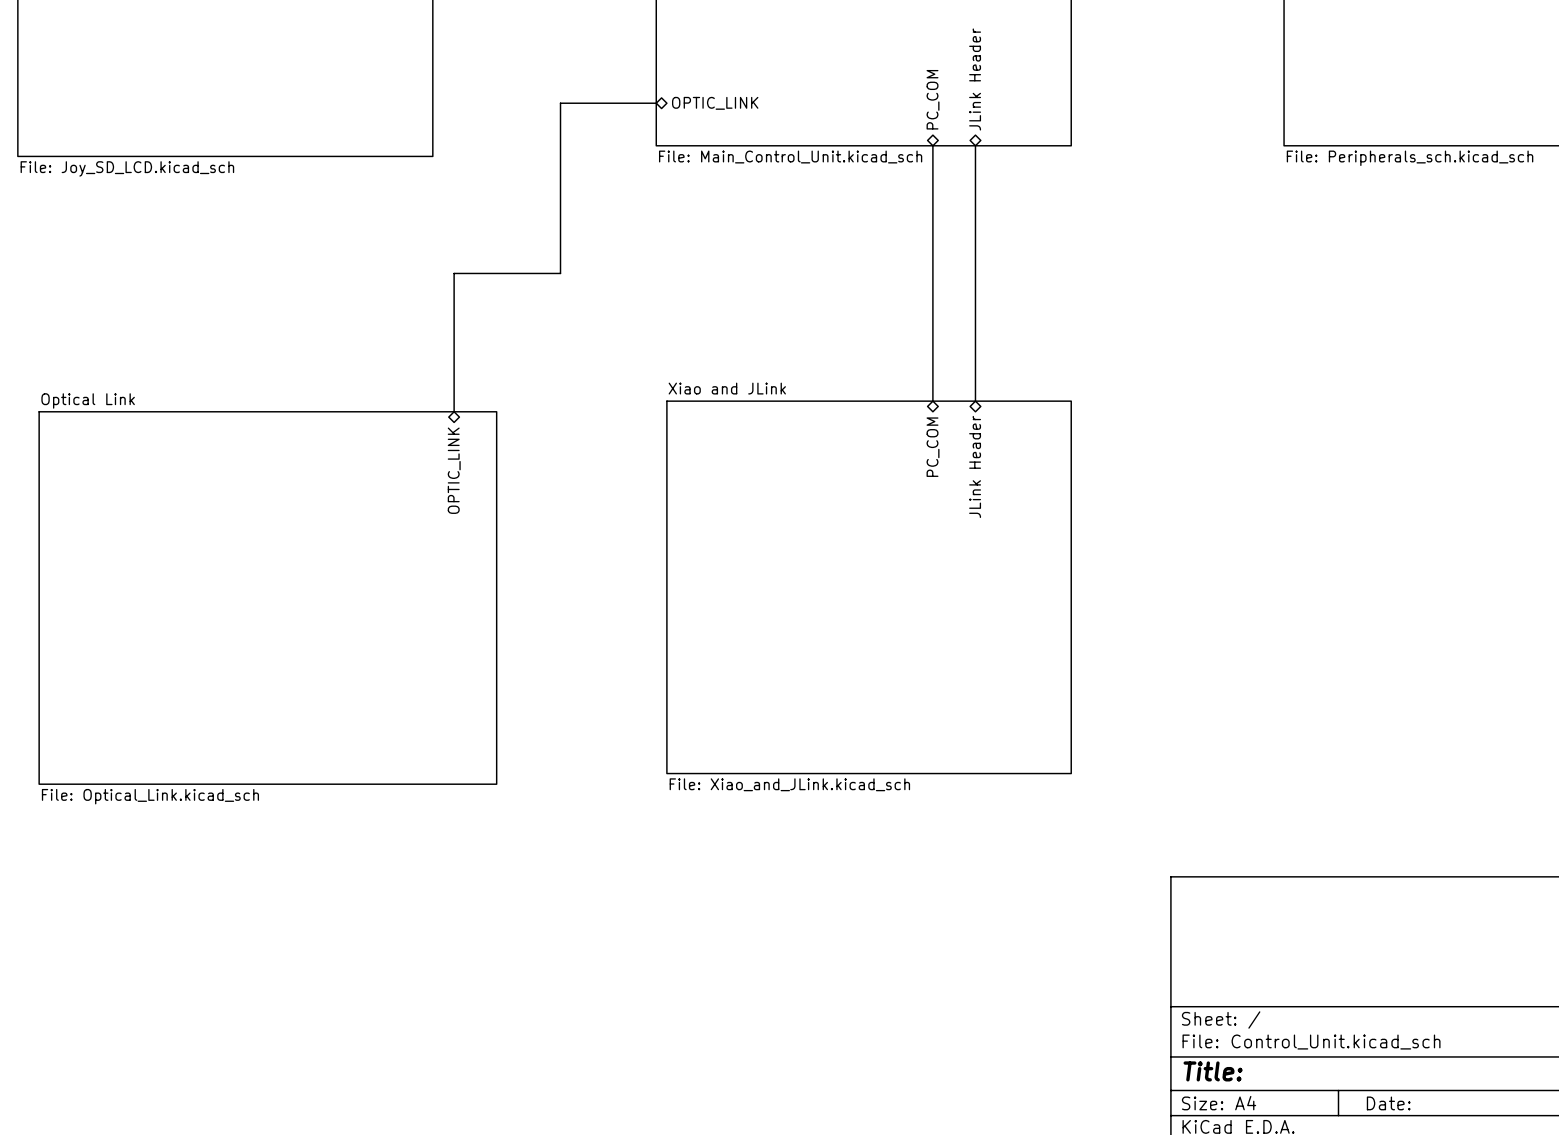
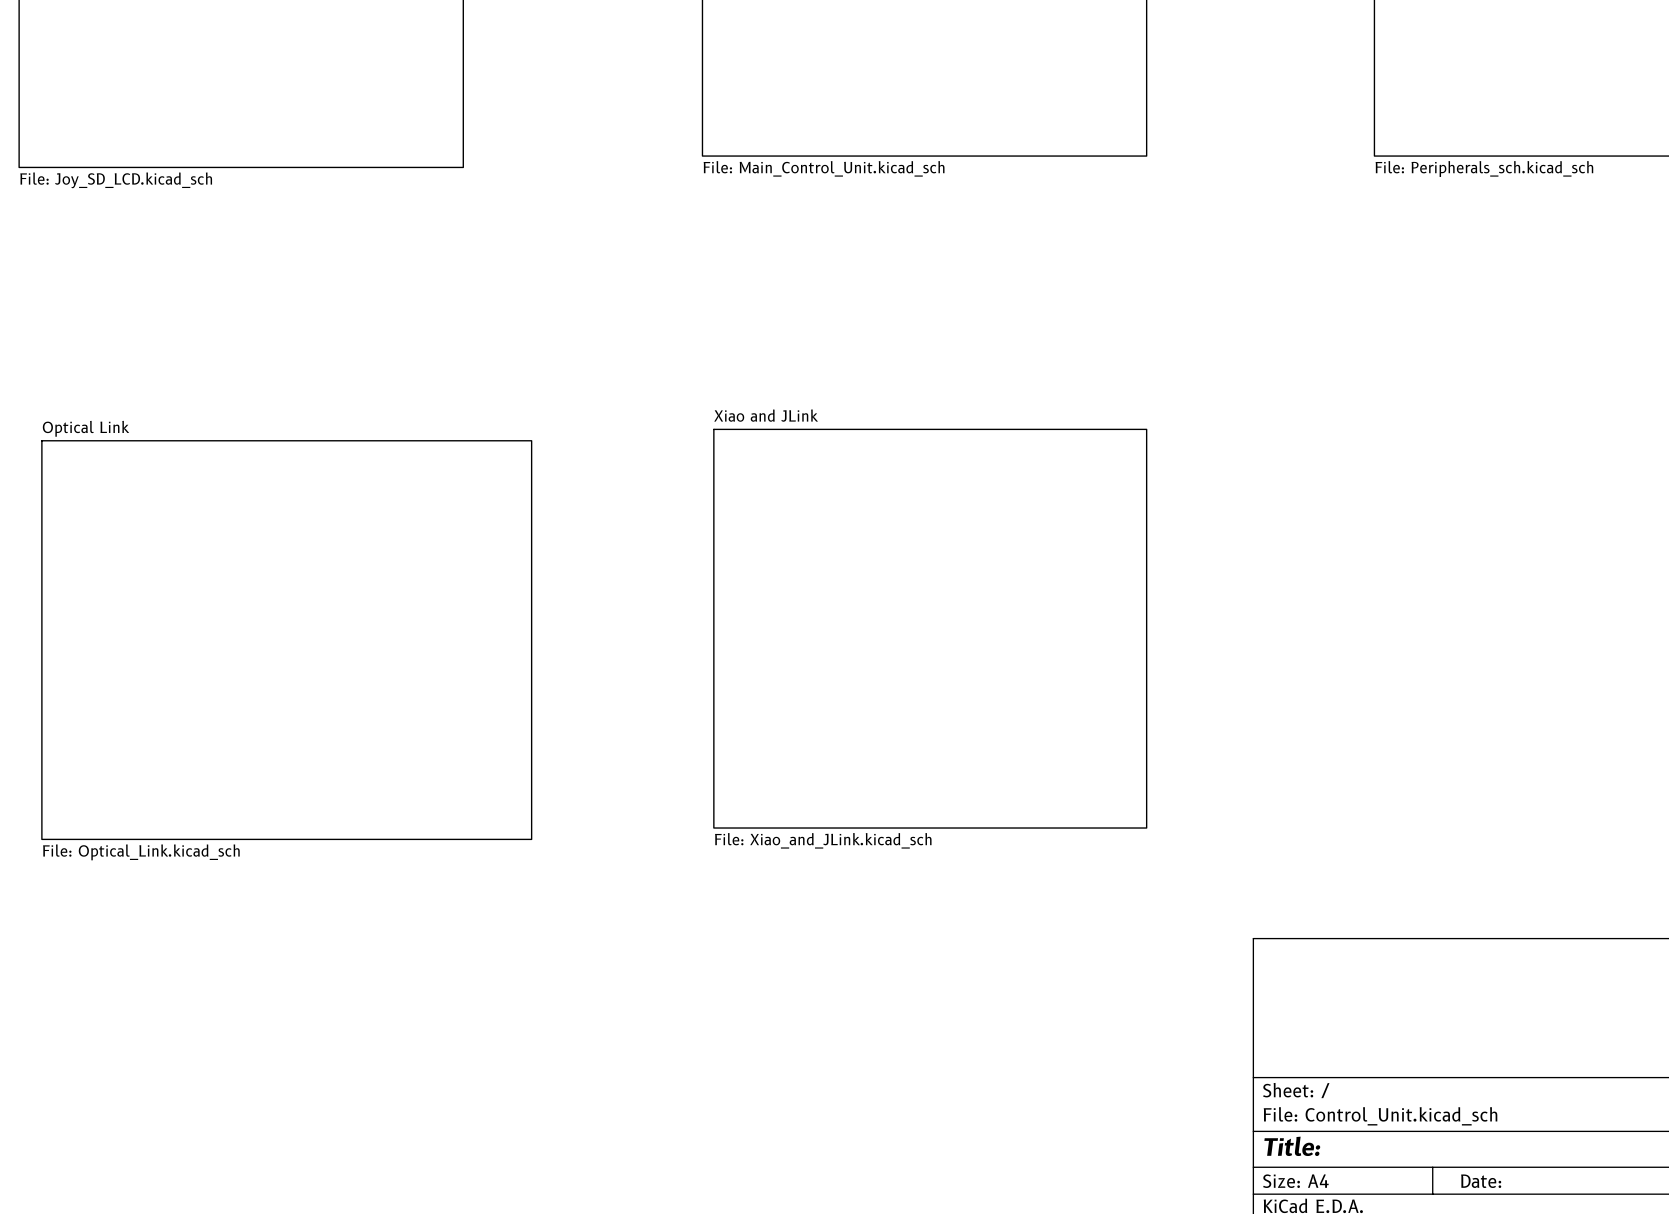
sheet pin: JLink Header (975, 79) -> none
sheet pin: PC_COM (933, 99) -> none
wire: (656, 103) (560, 103) (560, 273) (454, 273) (454, 411) -> none
sheet pin: OPTIC_LINK (715, 103) -> none
wire: (932, 145) (932, 401) -> none
wire: (975, 145) (975, 401) -> none
sheet pin: PC_COM (933, 447) -> none
sheet pin: JLink Header (975, 466) -> none
sheet pin: OPTIC_LINK (454, 470) -> none

